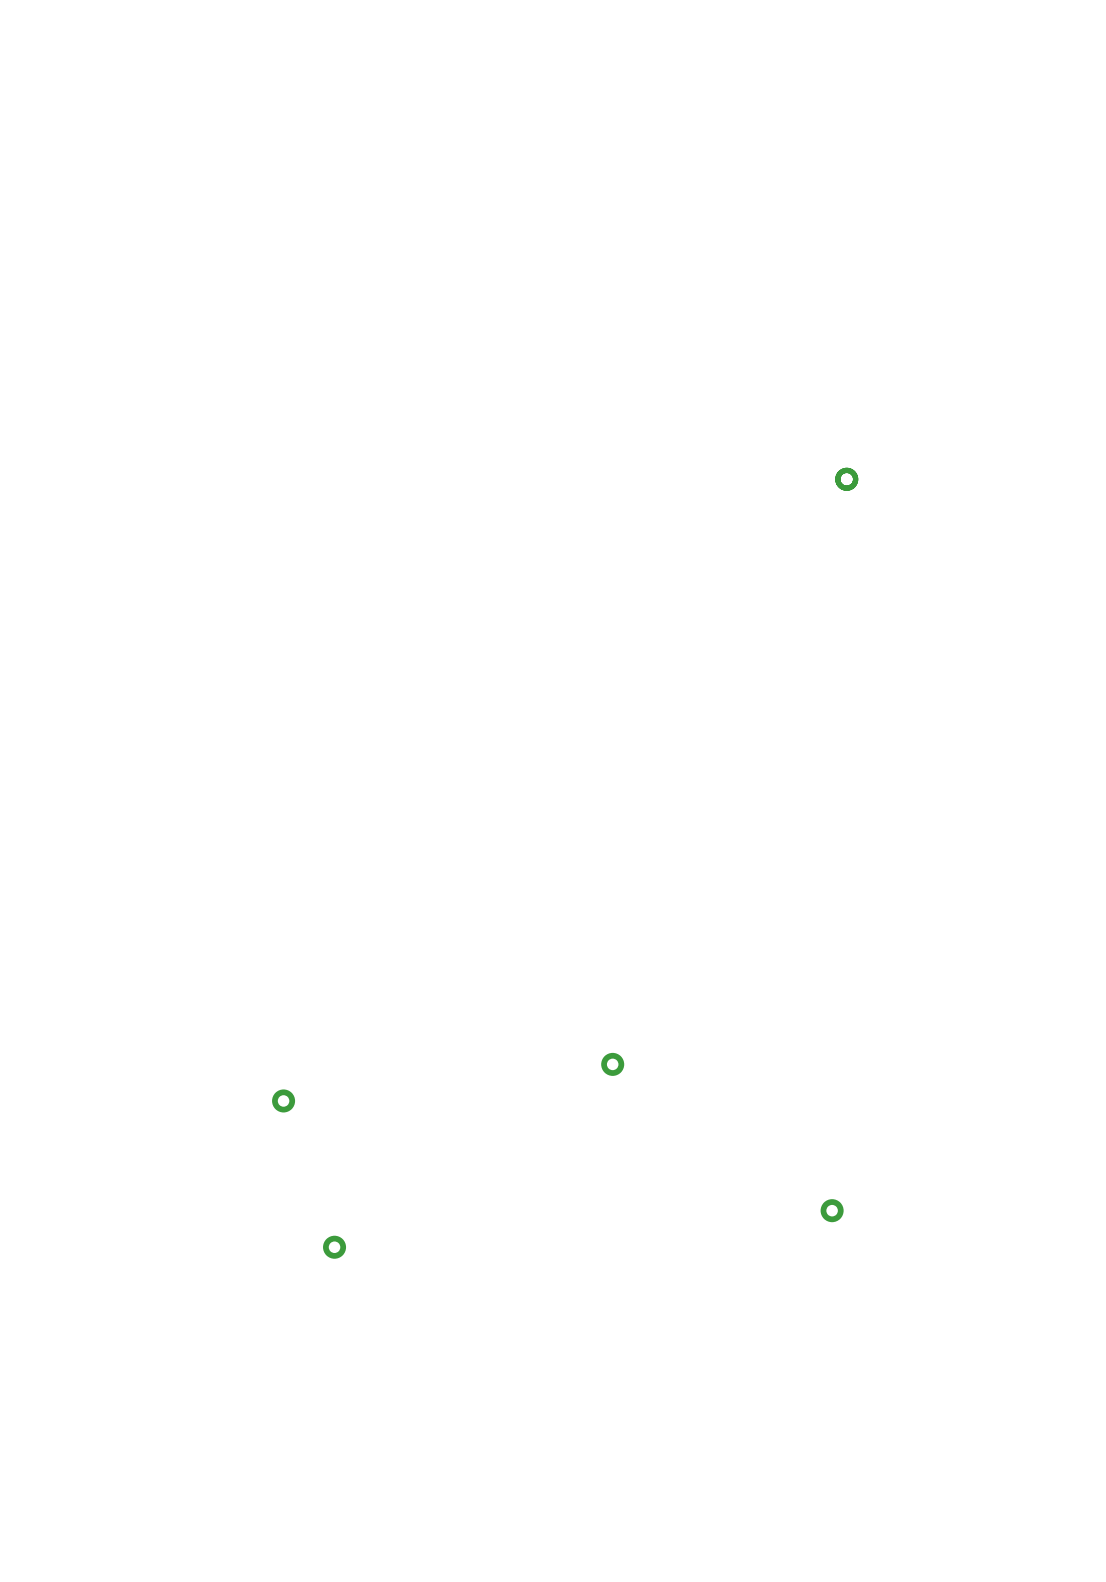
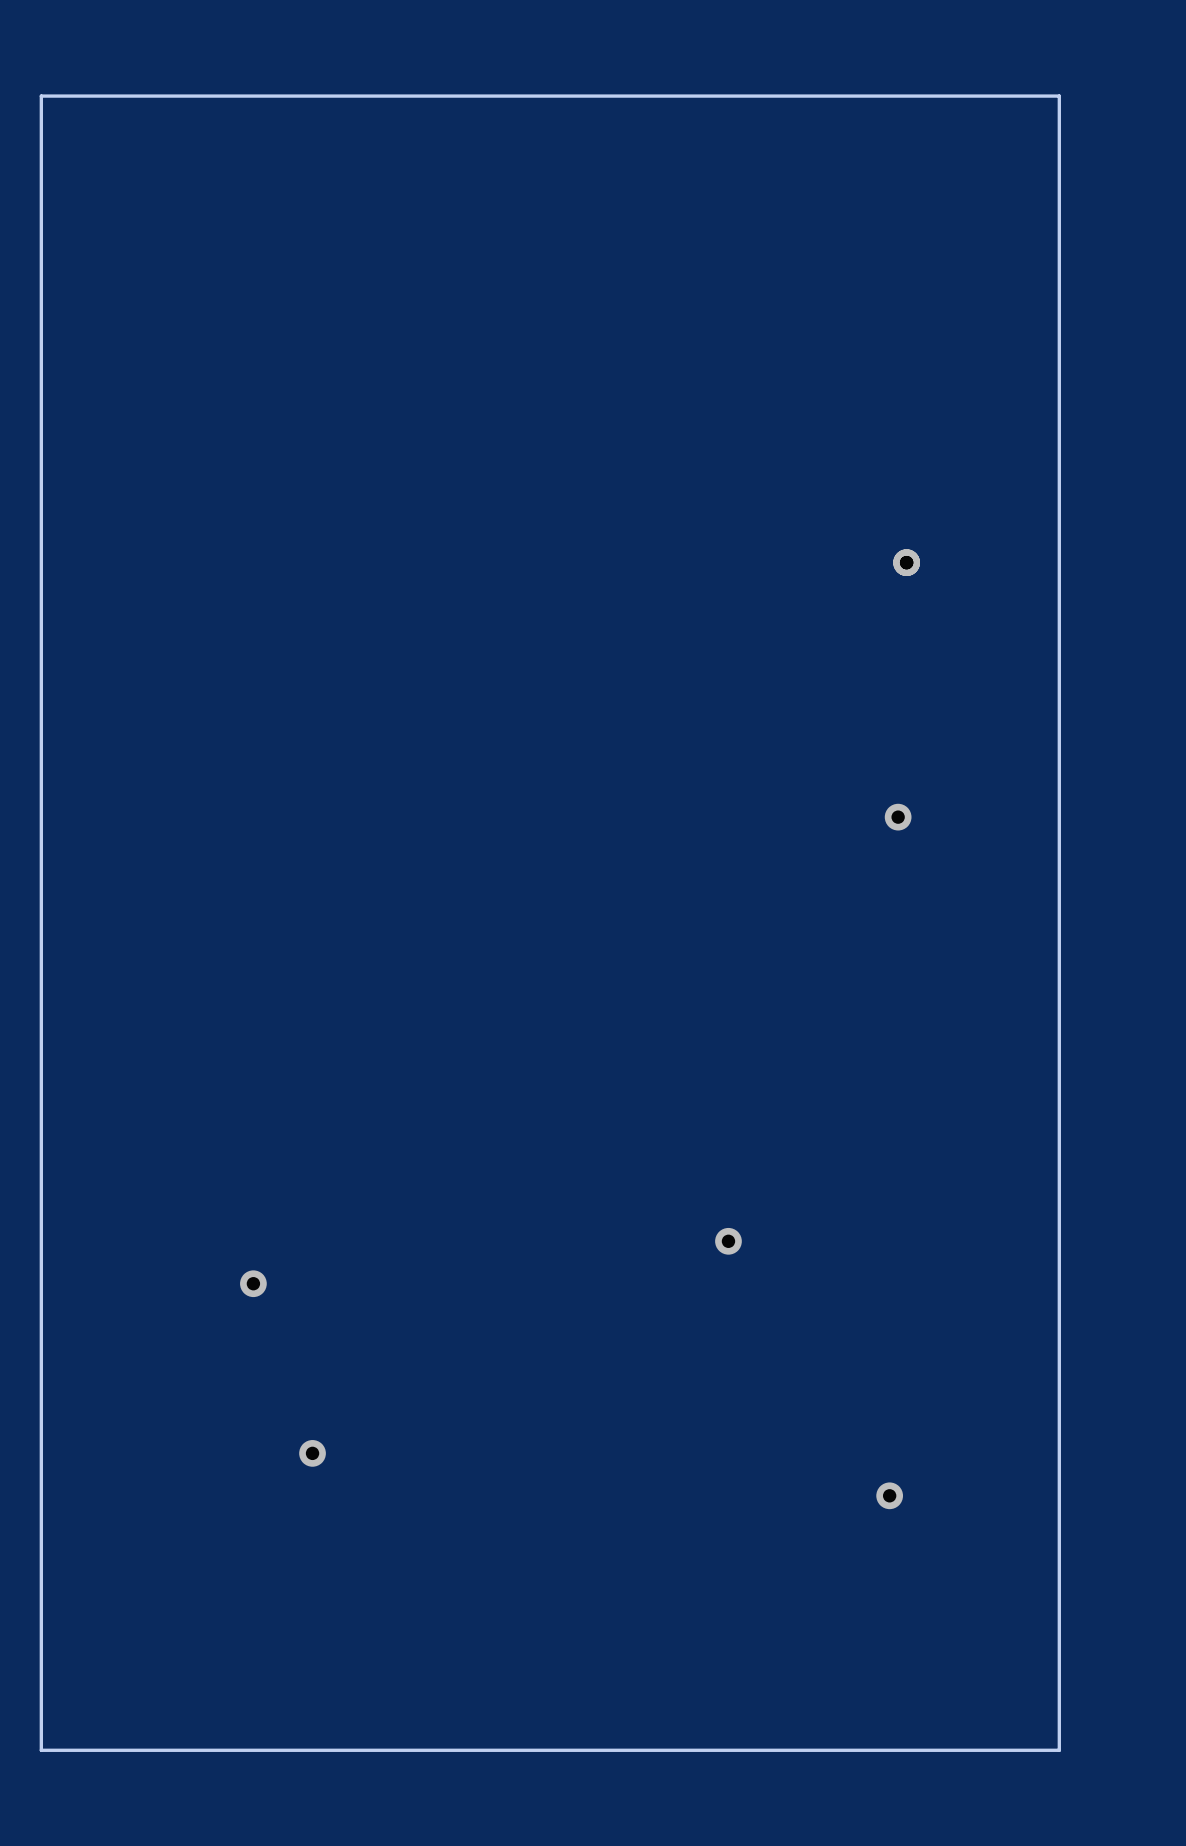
board edge: none -> (1059, 96) (41, 96) (41, 1750) (1059, 1750) (1059, 96)
via: none -> (898, 817)
via position: (612, 1064) -> (728, 1241)
via position: (832, 1210) -> (889, 1495)

